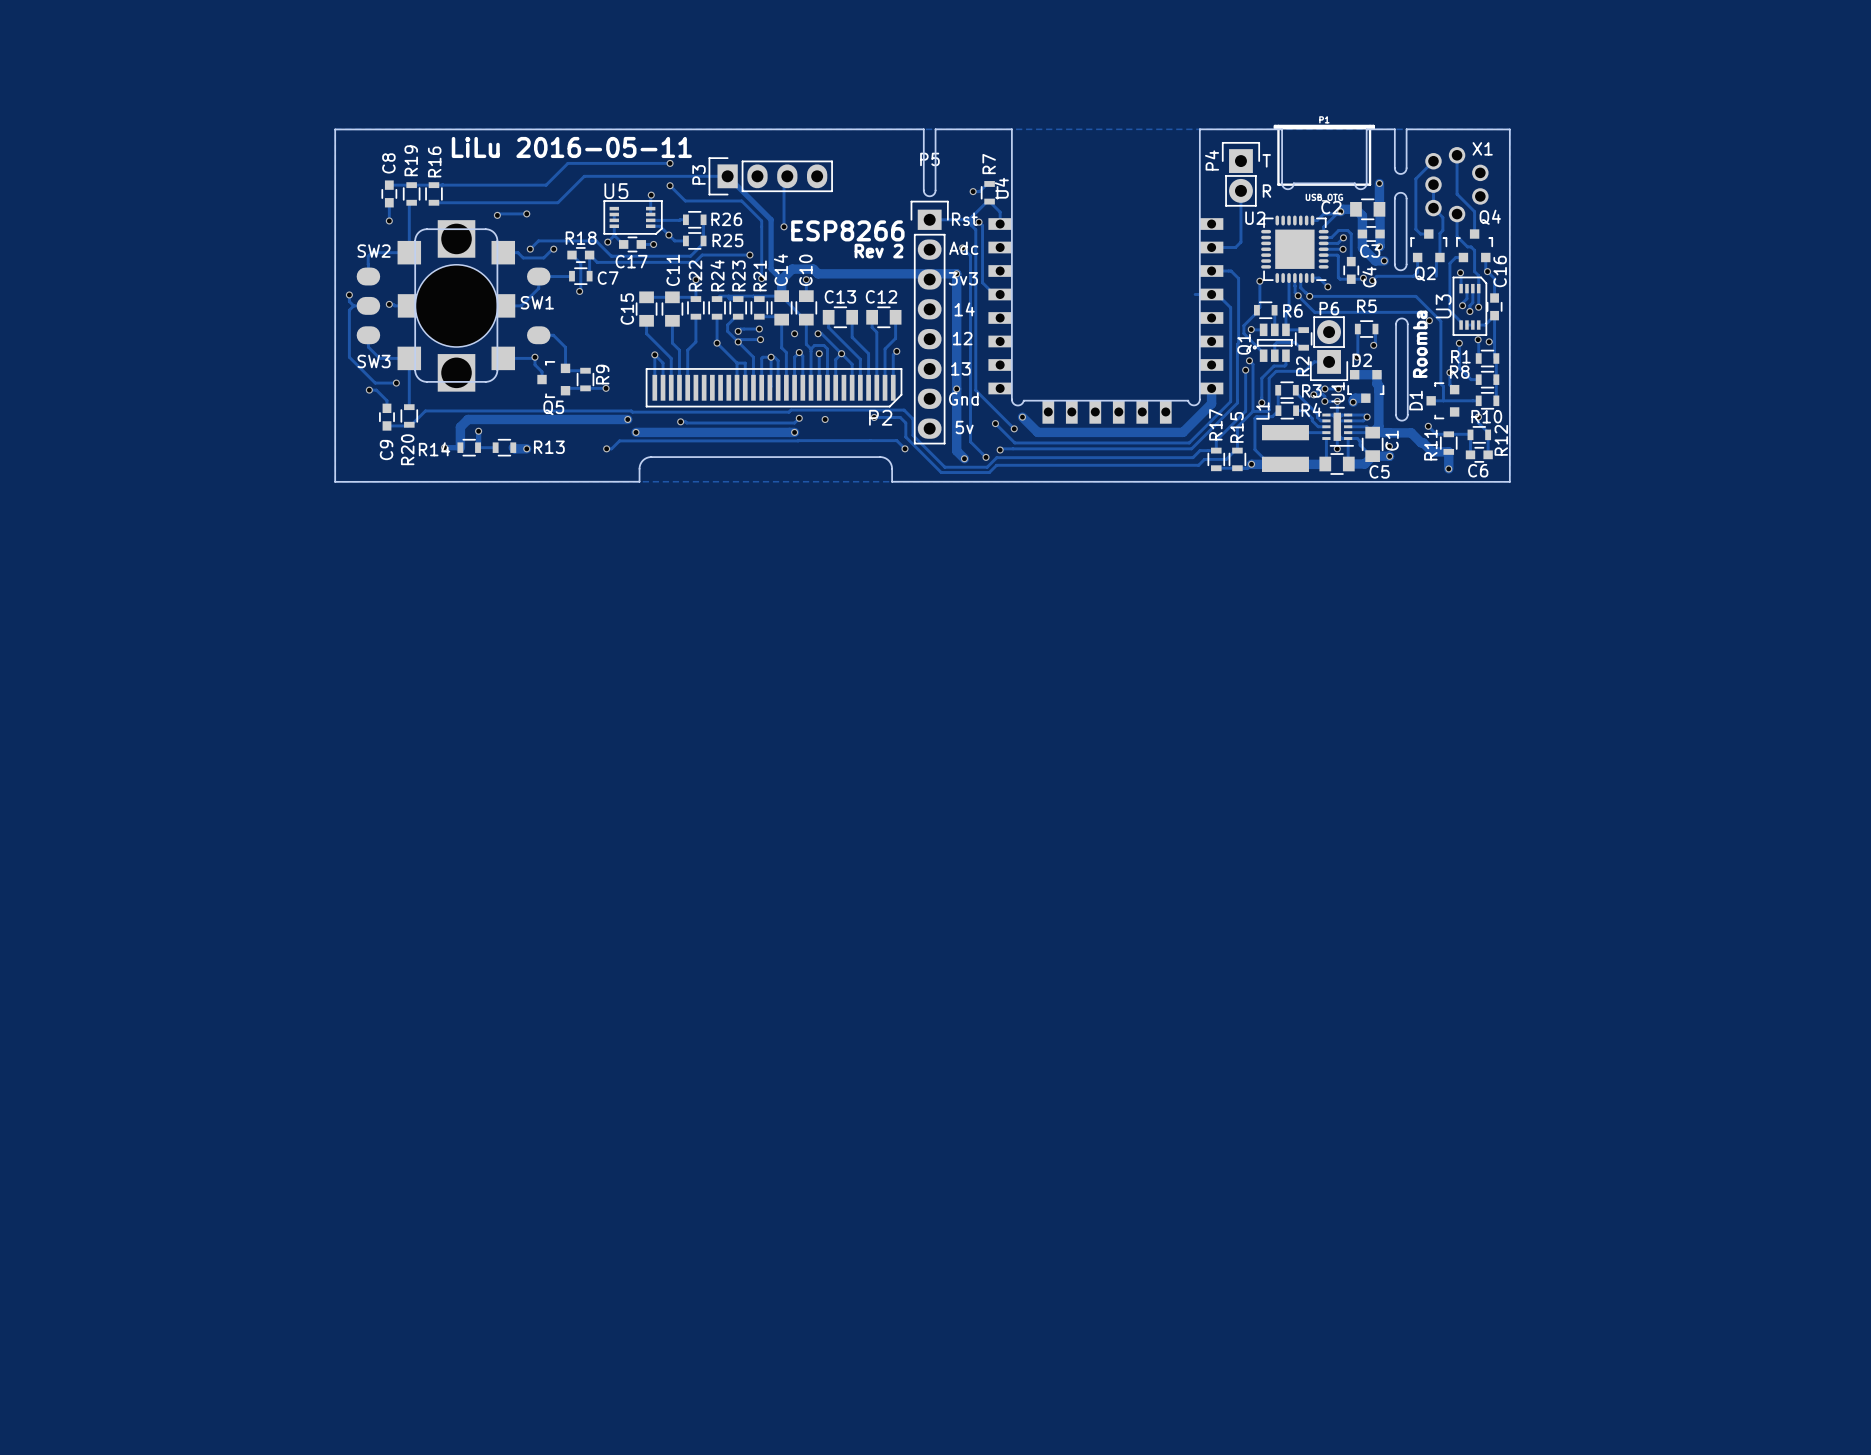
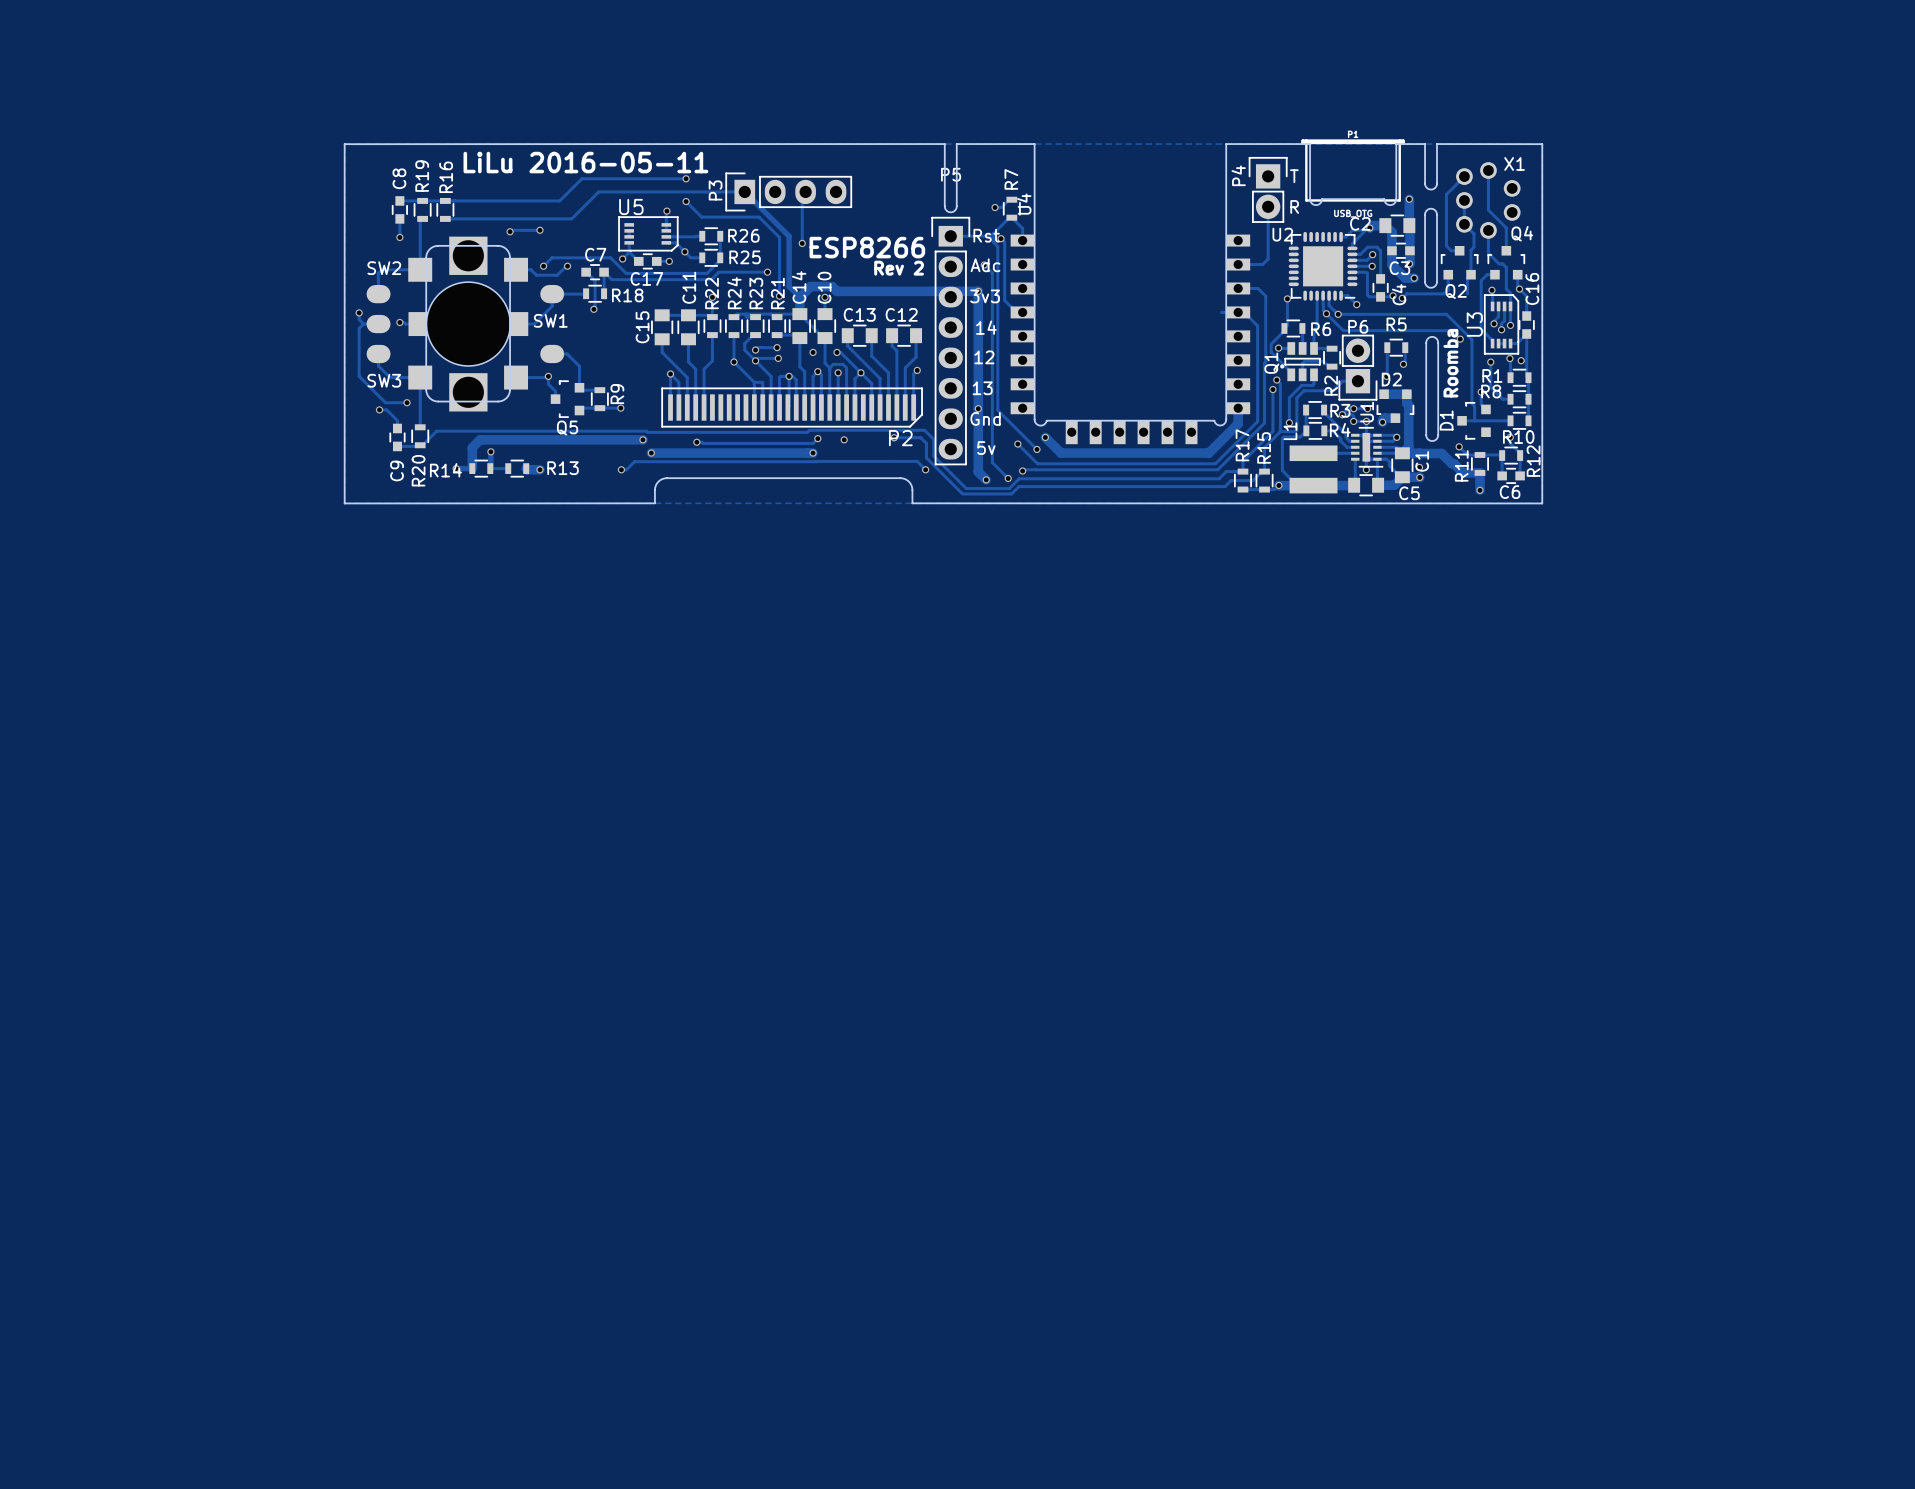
R18 name position: R18 (581, 238) -> R18 (627, 295)
C7 name position: C7 (608, 278) -> C7 (595, 254)

